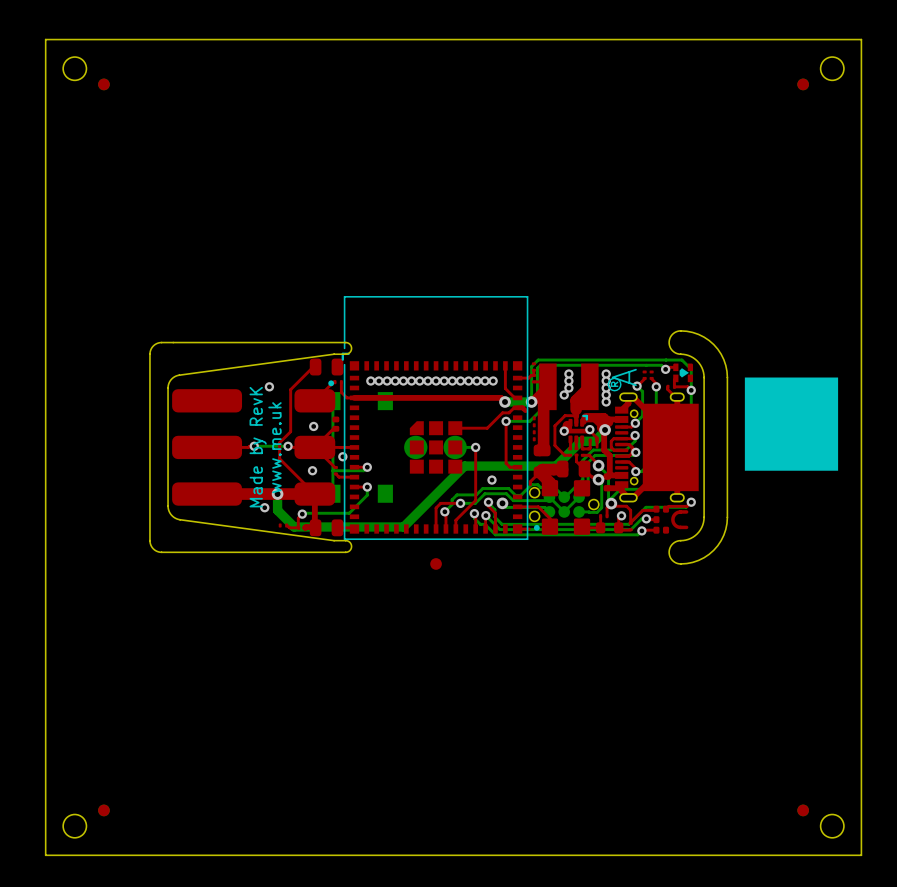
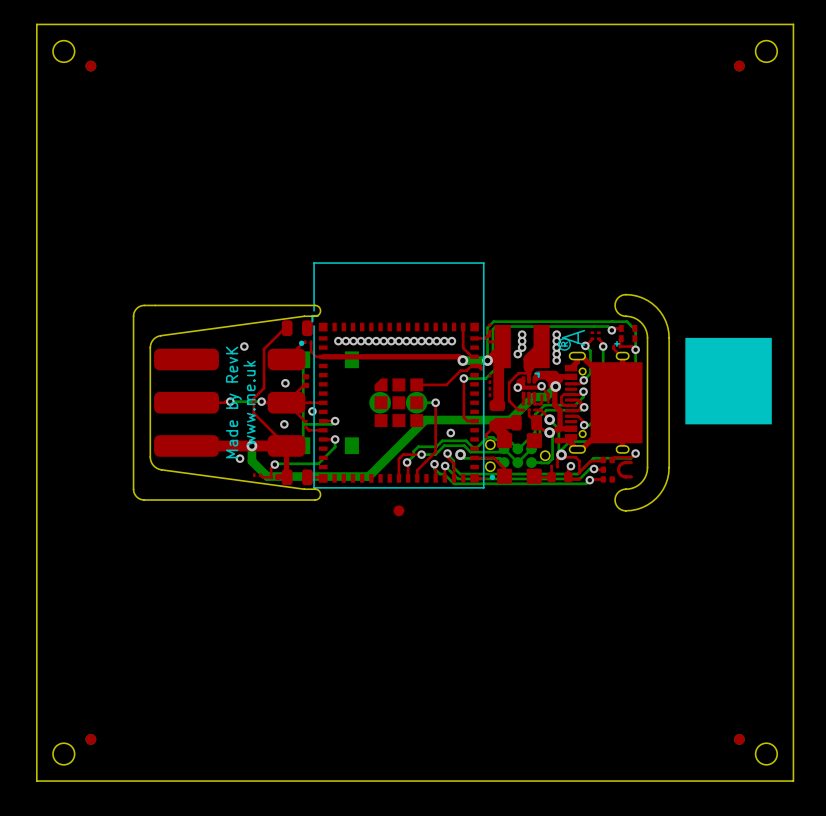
part footprint: [673, 363, 694, 383] -> [614, 324, 638, 347]

